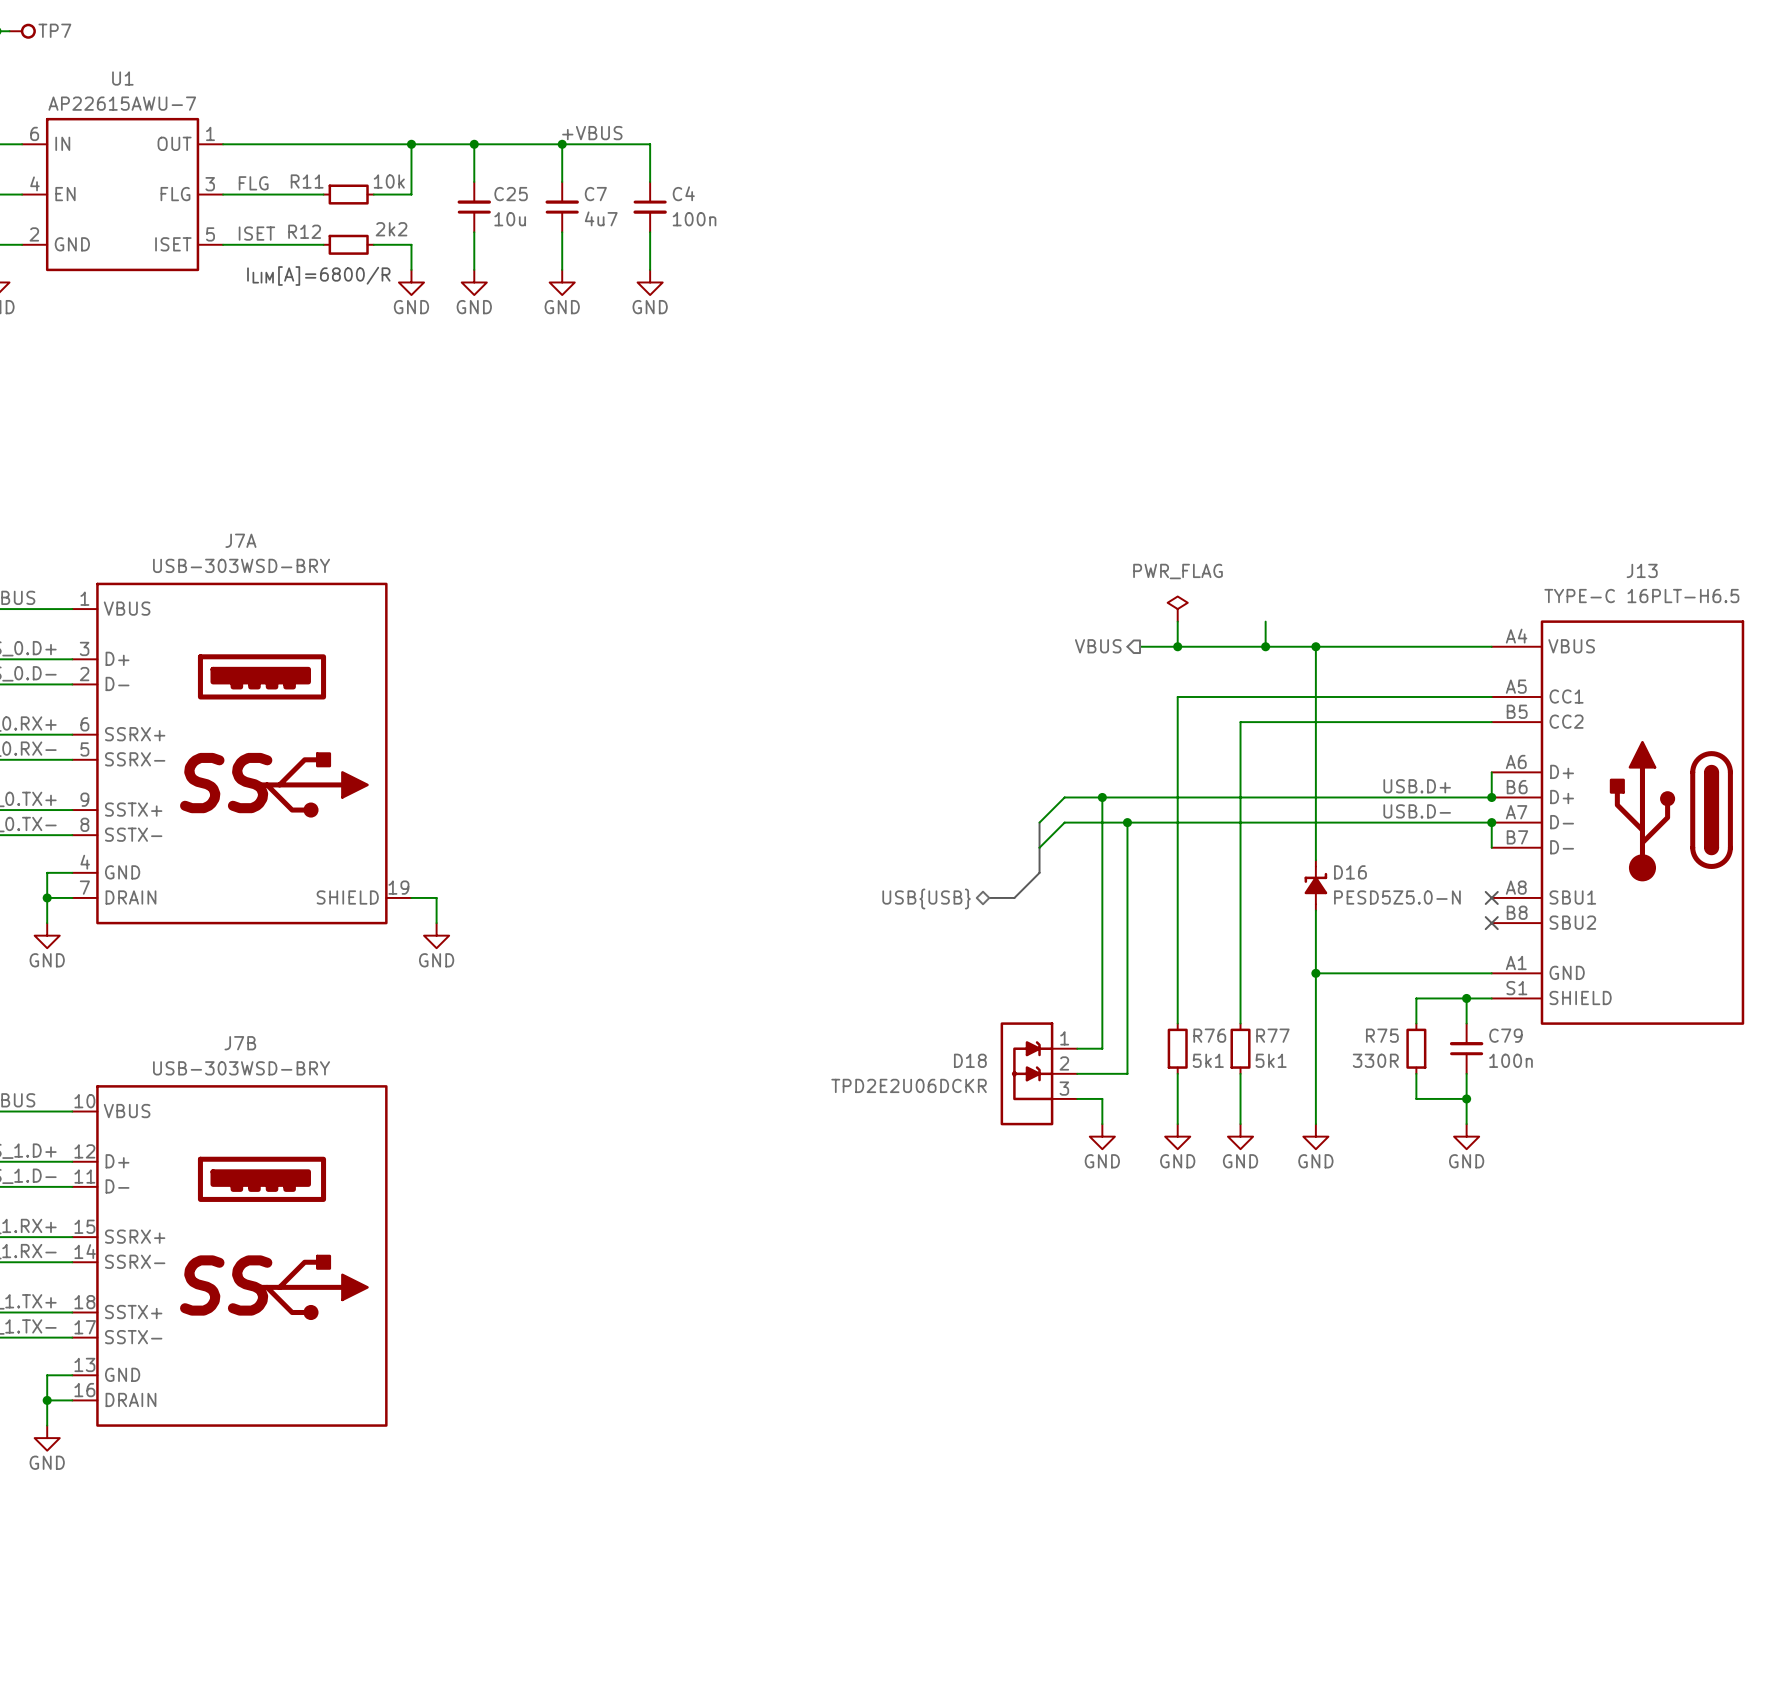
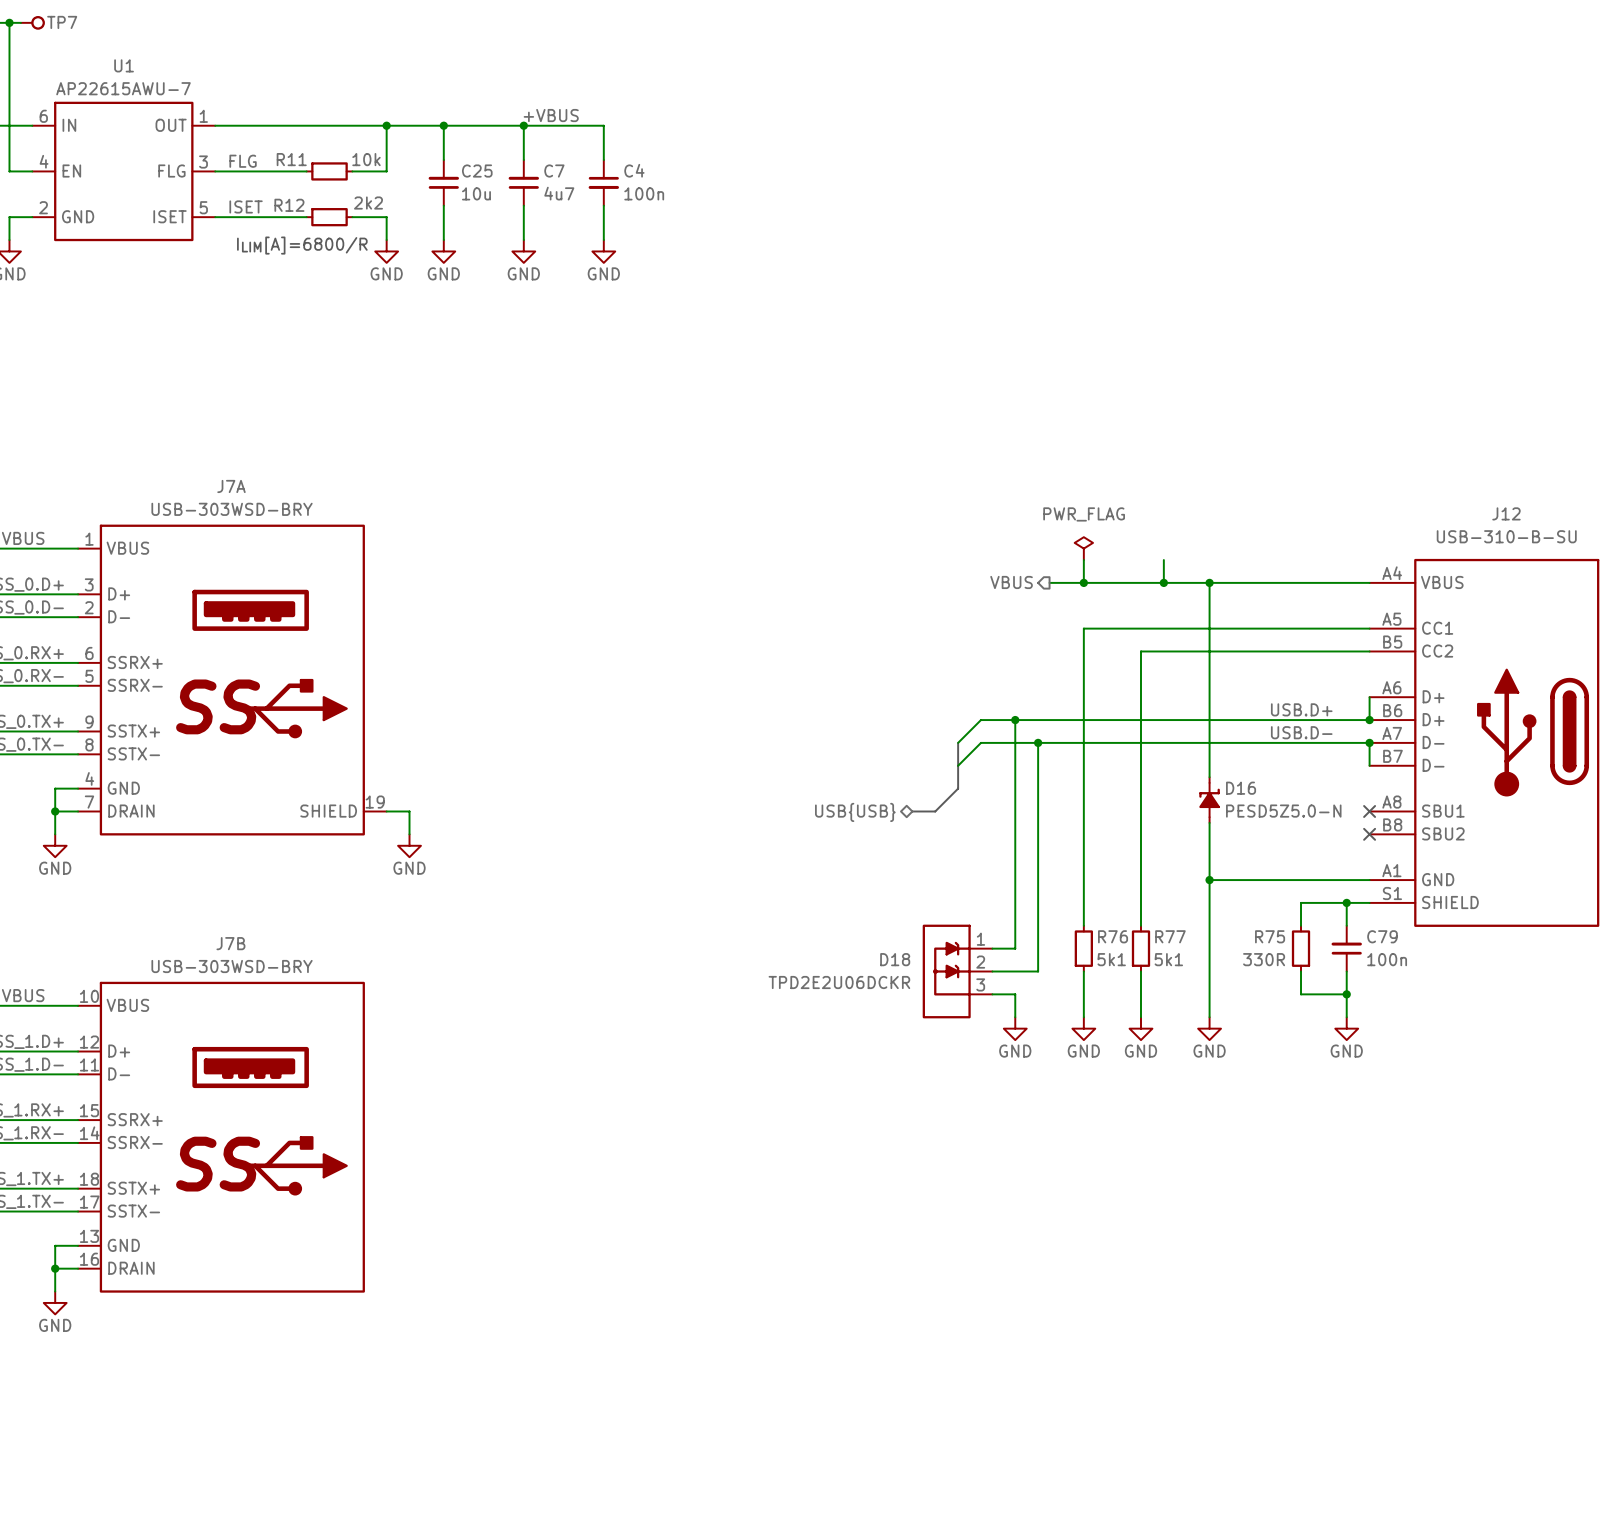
J13 name: J13 (1642, 570) -> J12 (1506, 513)
J13 text: TYPE-C 16PLT-H6.5 (1641, 596) -> USB-310-B-SU (1506, 536)

